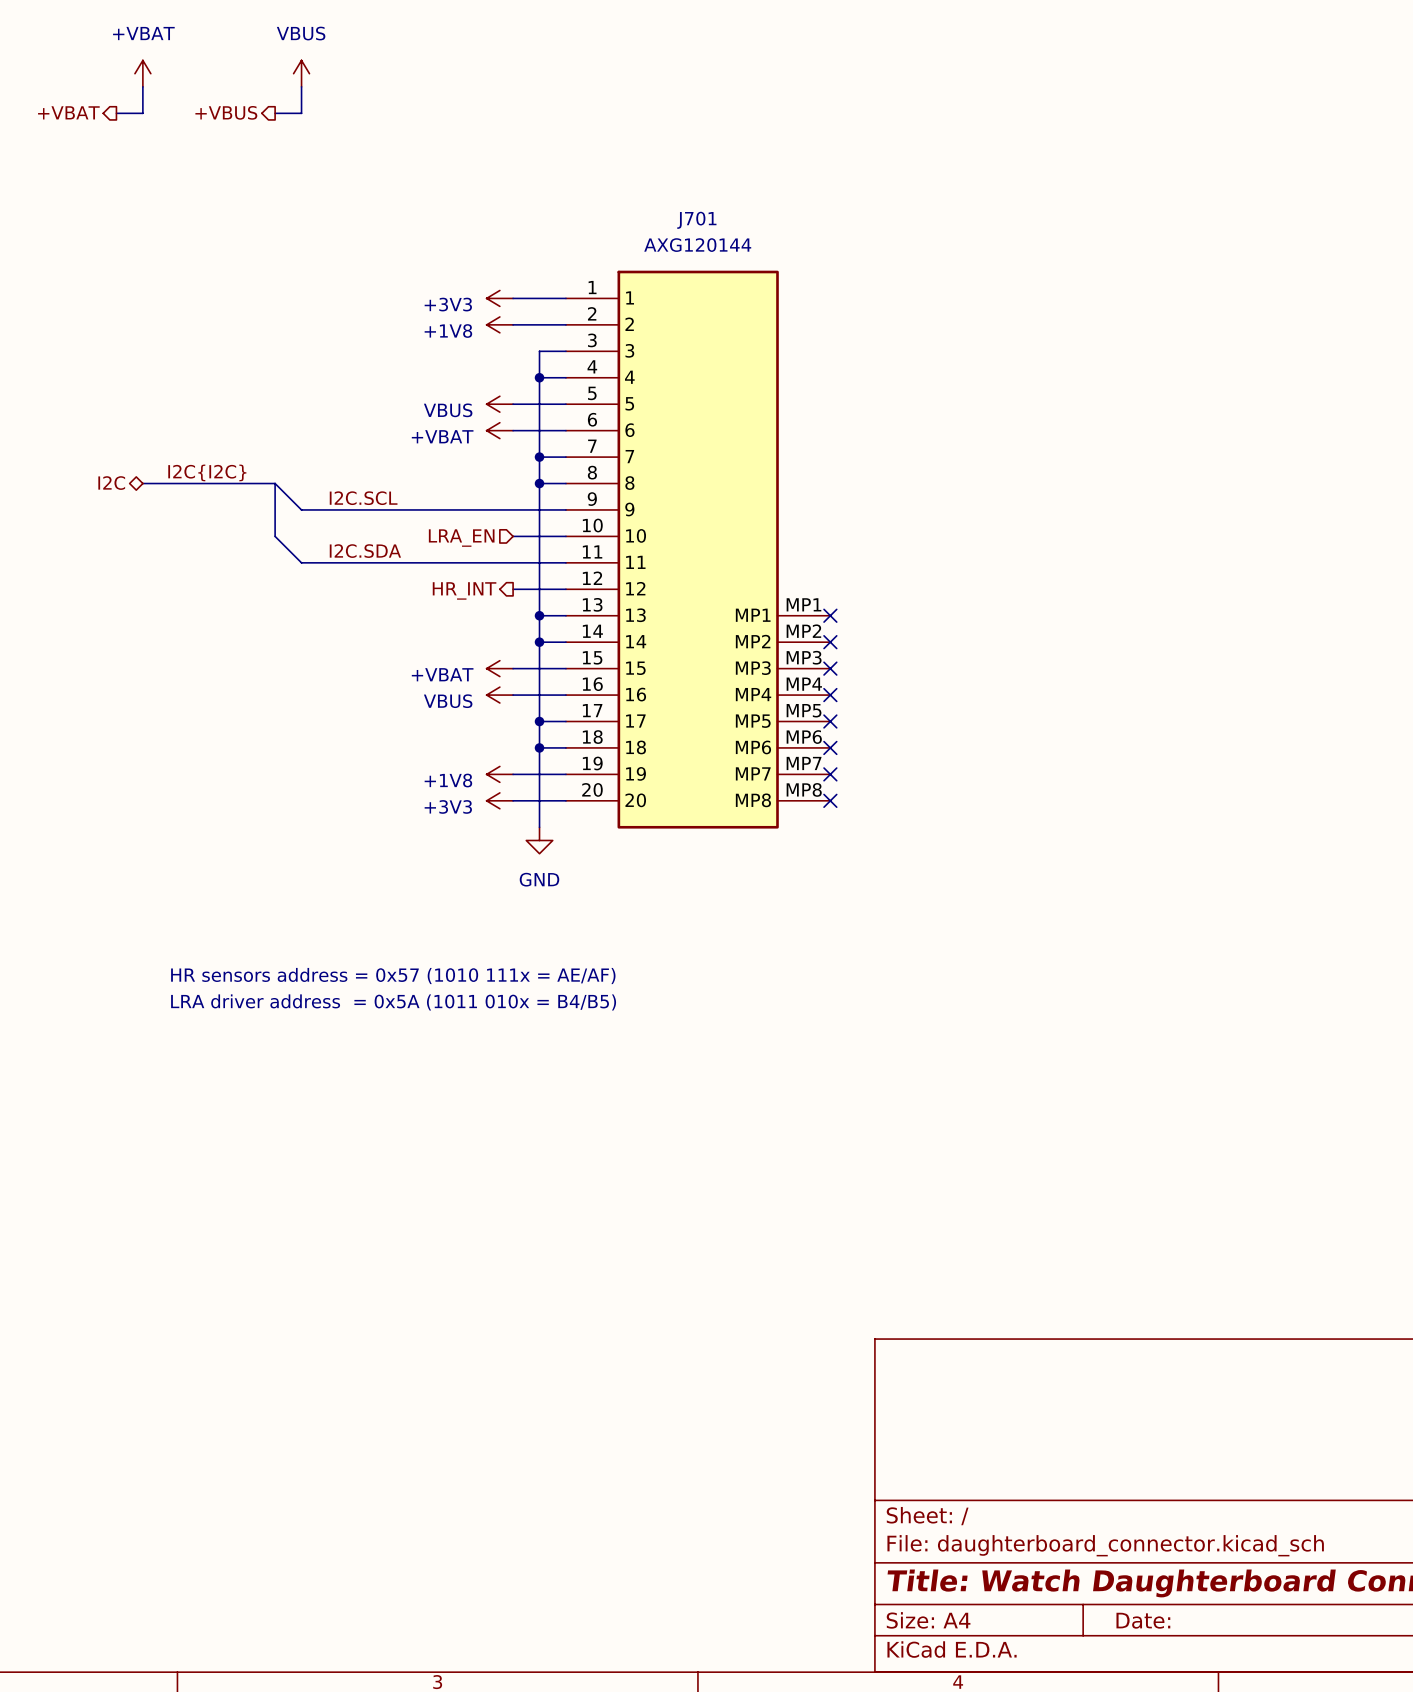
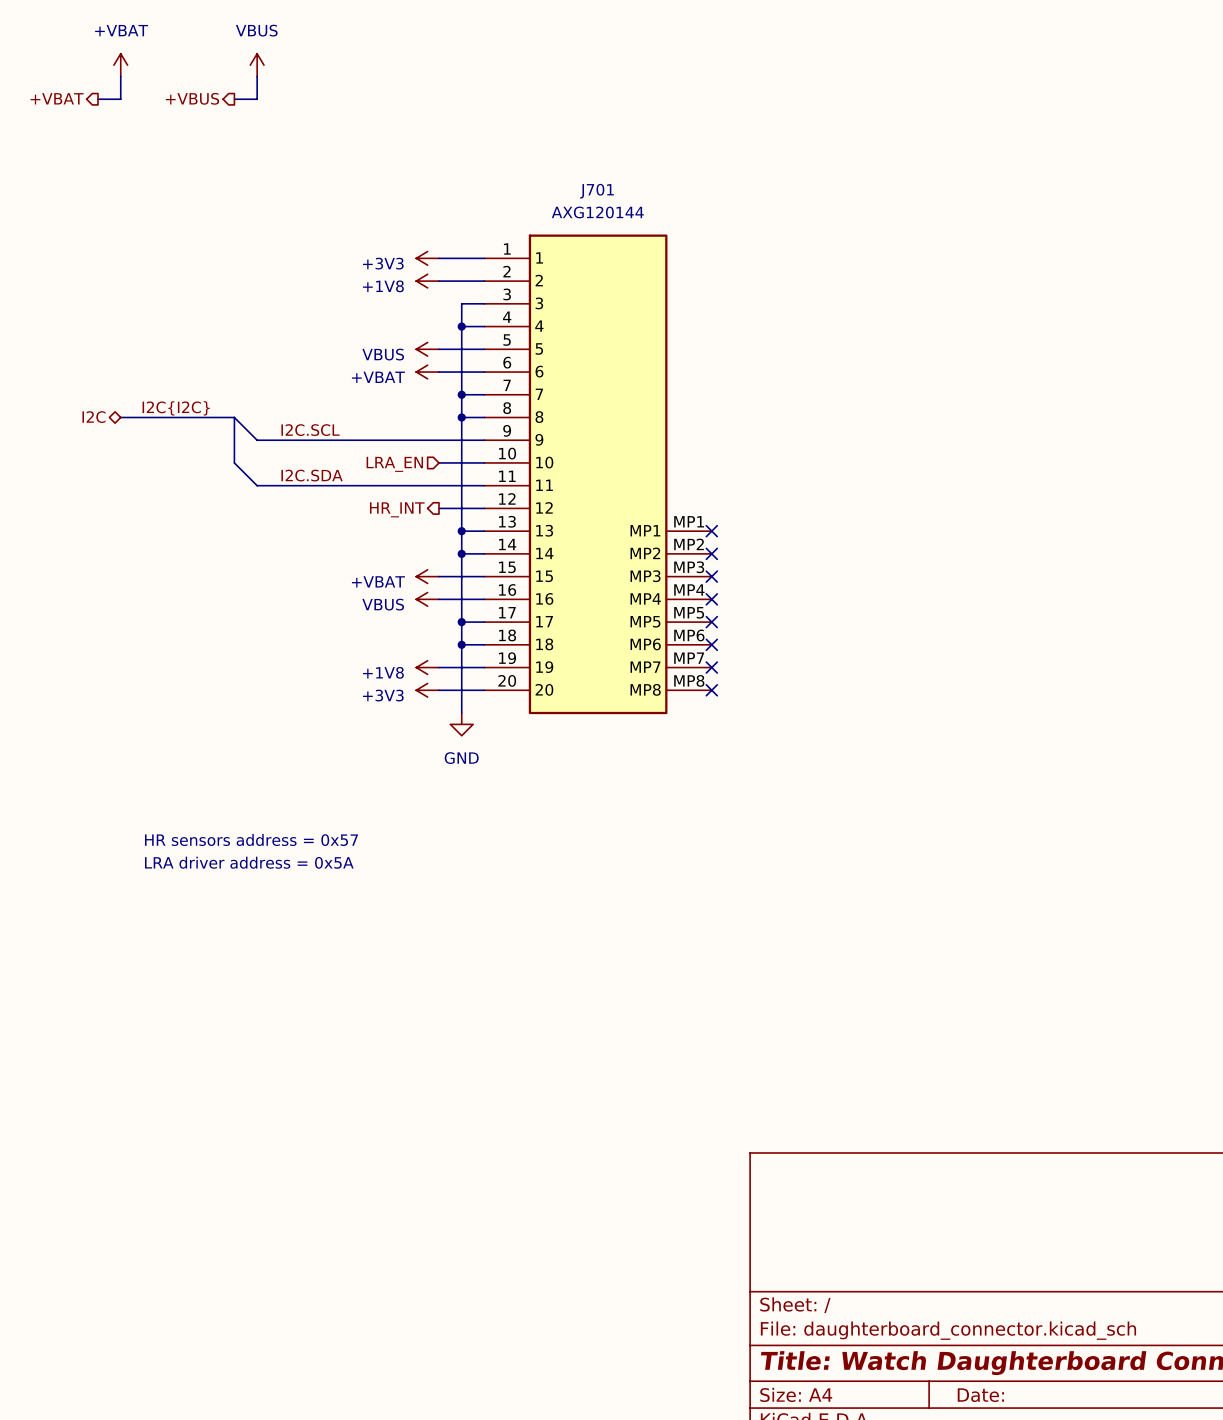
text: HR sensors address = 0x57 (1010 111x = AE/AF) (393, 976) -> HR sensors address = 0x57 (251, 839)
text: LRA driver address = 0x5A (1011 010x = B4/B5) (393, 1002) -> LRA driver address = 0x5A (249, 862)

